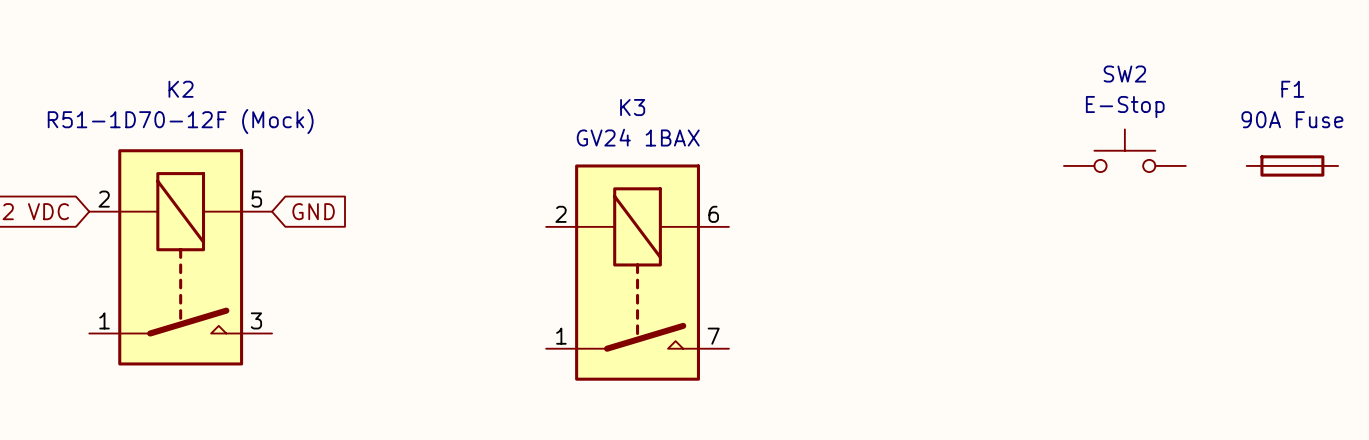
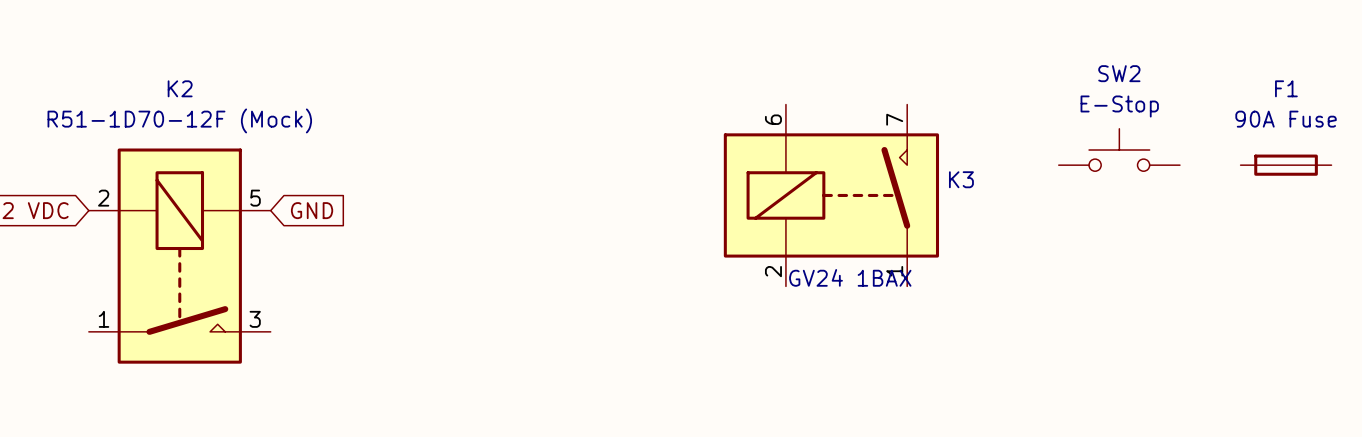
K3 name position: K3 (632, 107) -> K3 (961, 179)
K3 value position: GV24 1BAX (638, 137) -> GV24 1BAX (850, 277)
K3 rotation: 0° (637, 272) -> 90° counterclockwise (831, 195)
K3 position: (637, 272) -> (831, 195)

